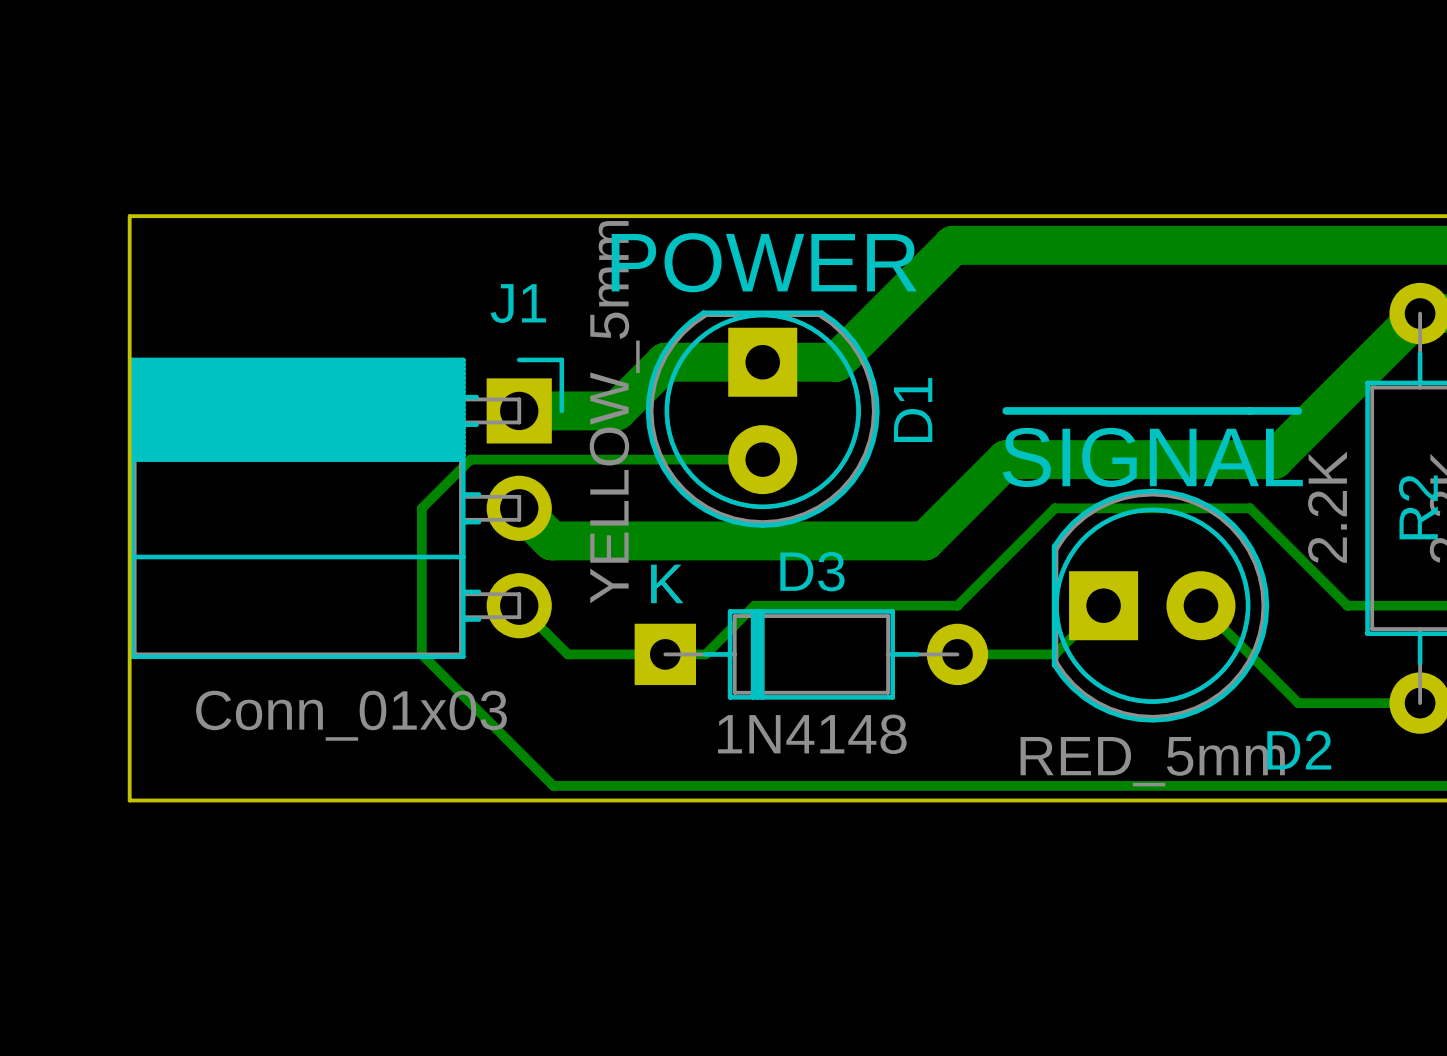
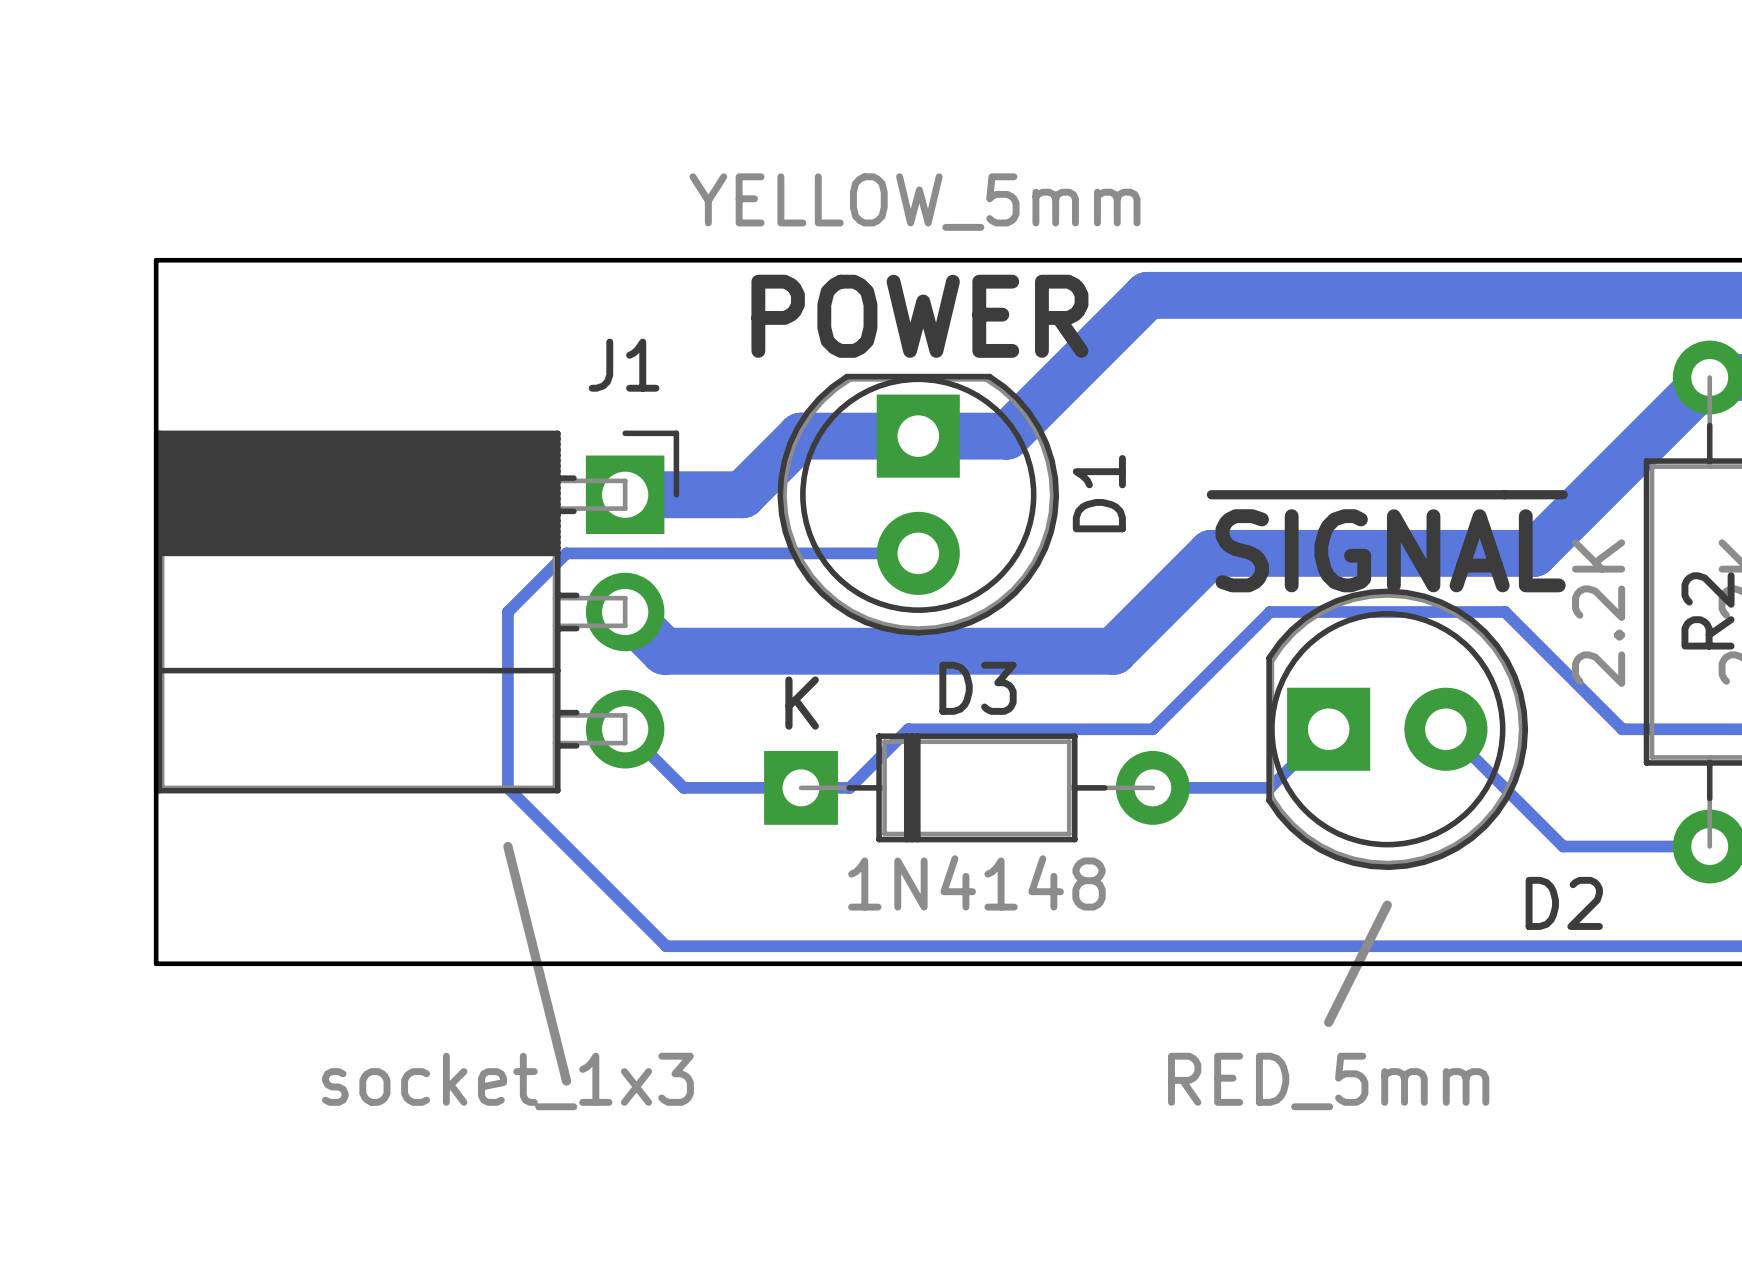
D1 value rotation: 0° (614, 412) -> 90° clockwise (914, 202)
line: none -> (507, 846) (566, 1081)
J1 value: Conn_01x03 (351, 715) -> socket_1x3 (507, 1081)
line: none -> (1387, 905) (1328, 1022)
D2 value position: RED_5mm (1152, 761) -> RED_5mm (1328, 1081)

